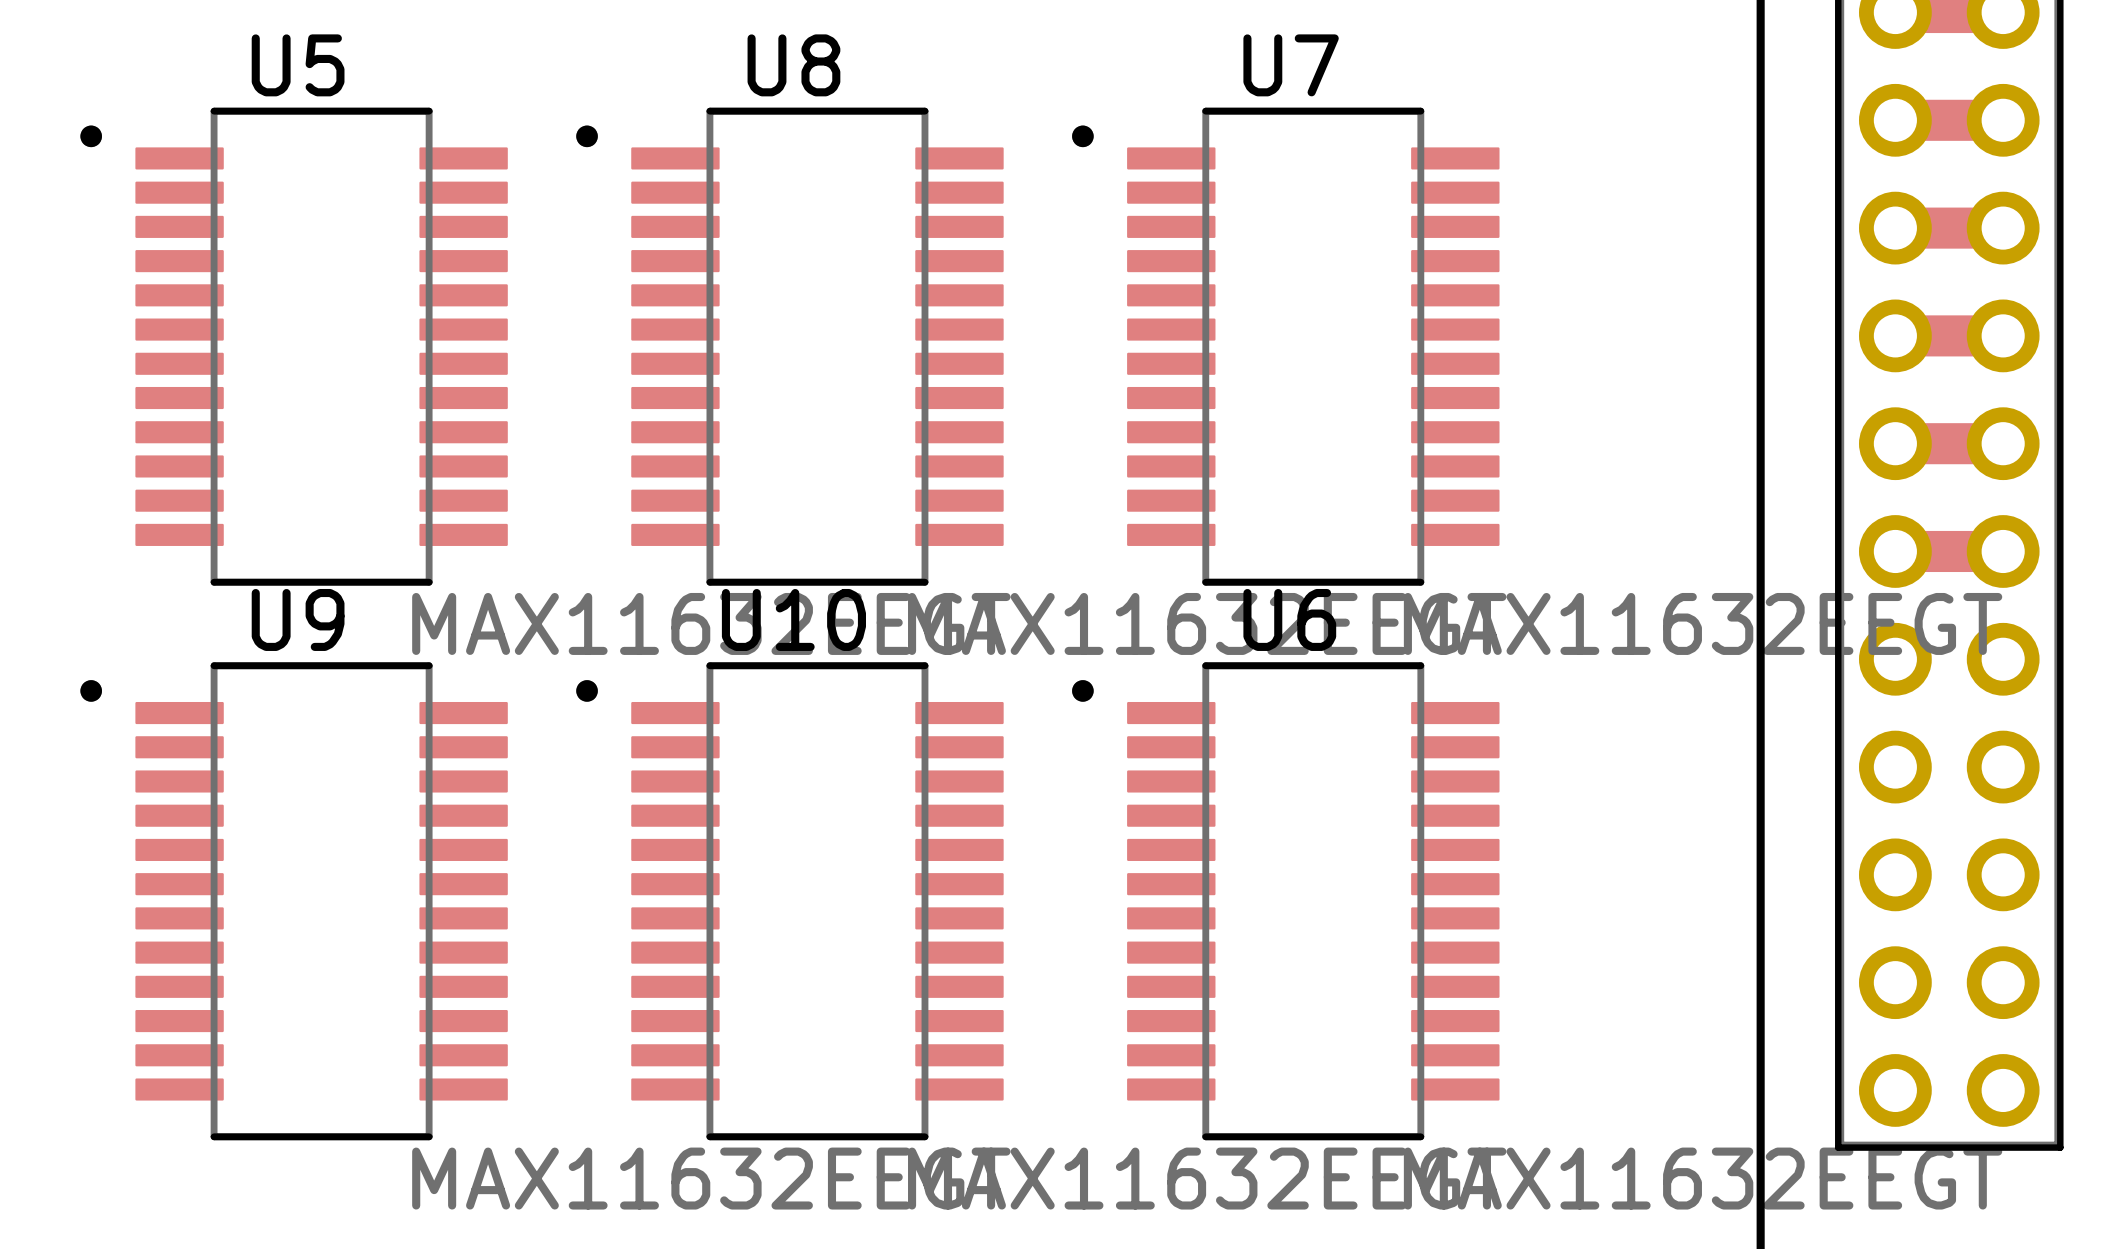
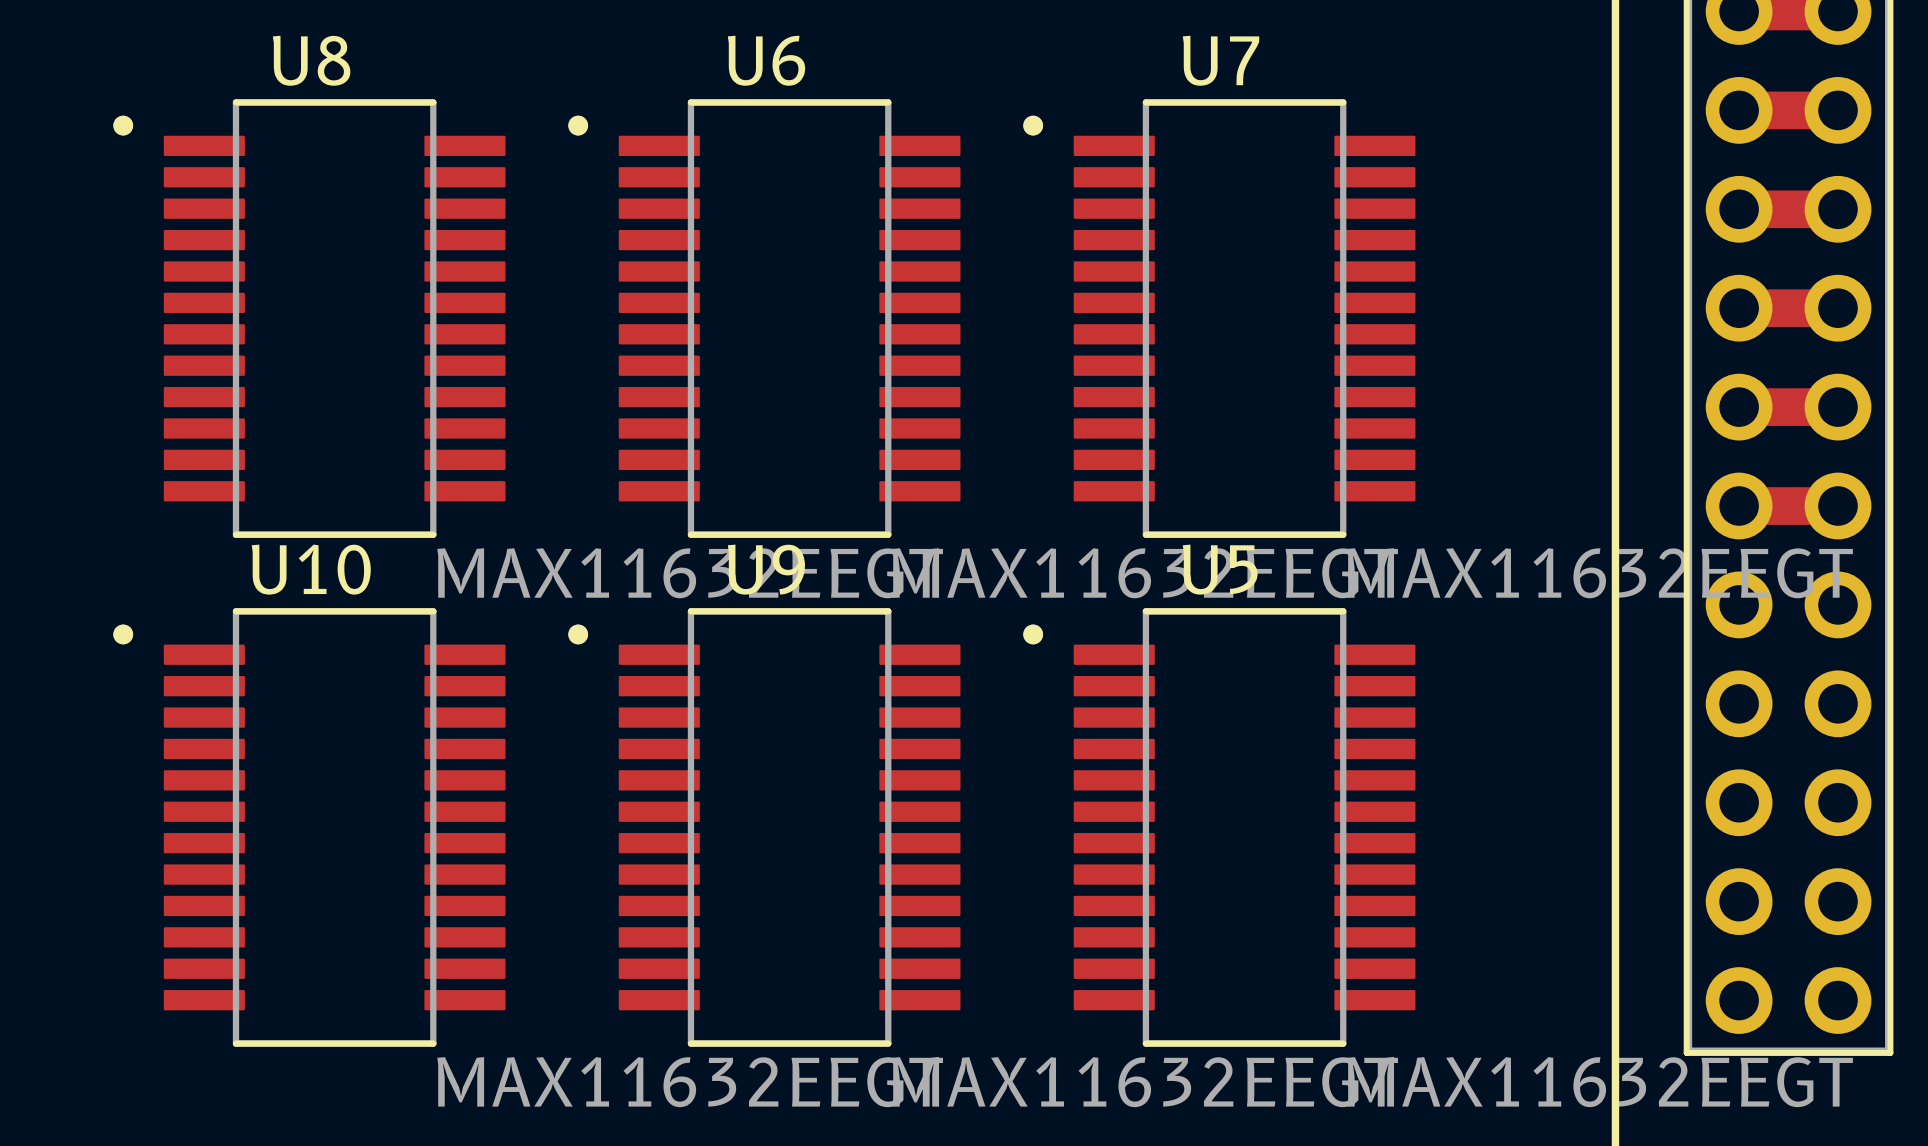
U5 position: (294, 346) -> (1219, 827)
U8 position: (789, 346) -> (309, 318)
U7 position: (1285, 346) -> (1219, 318)
U9 position: (294, 901) -> (764, 827)
U10 position: (789, 901) -> (309, 827)
U6 position: (1285, 901) -> (764, 318)

